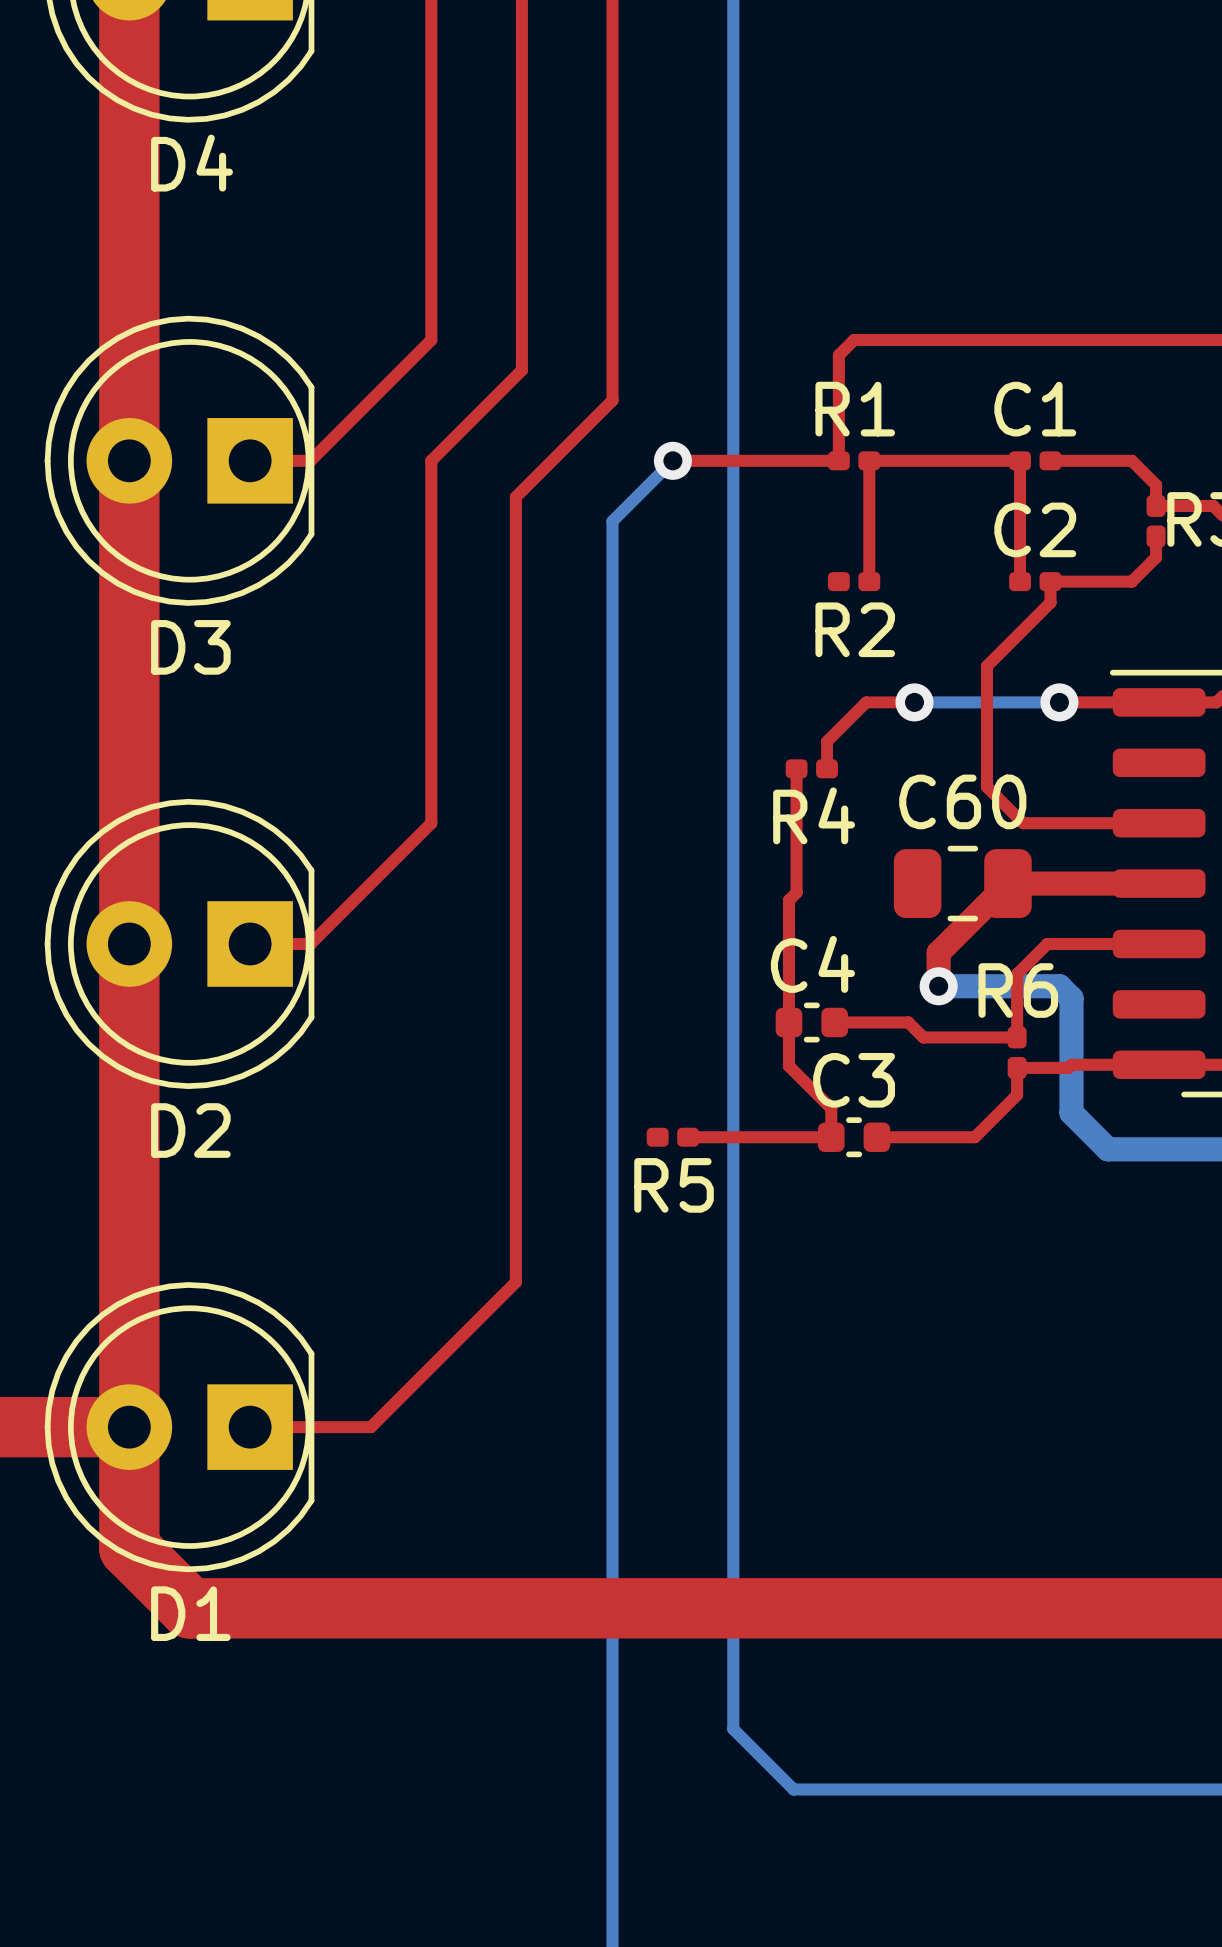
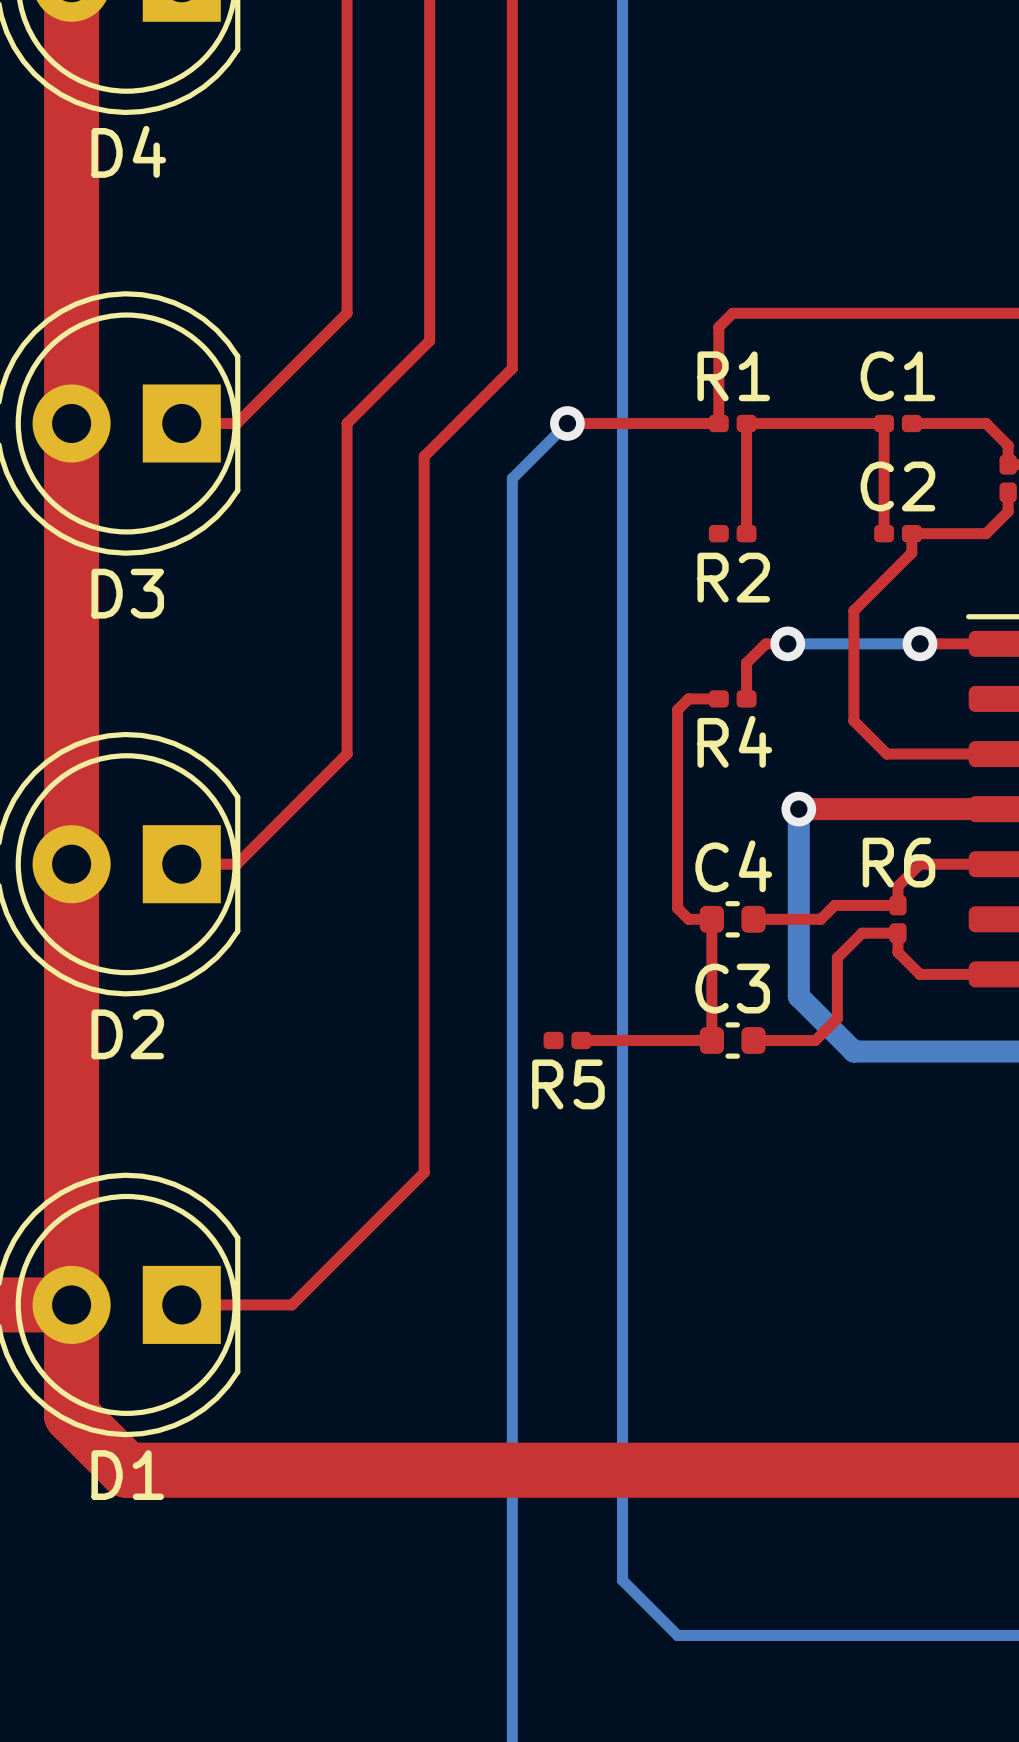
top track: (890, 702) (866, 702) (827, 741) (827, 768) -> (765, 643) (746, 663) (746, 698)
top track: (796, 768) (796, 892) (788, 900) (788, 1066) (831, 1108) -> (718, 698) (688, 698) (677, 709) (677, 908) (688, 919) (711, 919) (711, 1014)
R4 position: (811, 768) -> (732, 698)
C60: (962, 883) -> none
top track: (1007, 883) (938, 952) (938, 986) -> (873, 809) (798, 809)
top track: (1059, 943) (1047, 943) (1017, 974) (1017, 1037) (923, 1037) (908, 1022) (834, 1022) -> (920, 864) (897, 886) (897, 905) (834, 905) (820, 919) (753, 919)
bottom track: (938, 986) (1059, 986) (1071, 998) (1071, 1112) (1107, 1149) -> (798, 809) (798, 996) (853, 1051) (964, 1051)
via position: (938, 986) -> (798, 809)
C4 position: (811, 1022) -> (732, 919)
R6 position: (1017, 1052) -> (897, 919)
top track: (1071, 1064) (1068, 1067) (1017, 1067) (1017, 1094) (974, 1137) (944, 1137) -> (931, 974) (920, 974) (897, 952) (897, 933) (862, 933) (837, 957) (837, 1018) (815, 1040)

